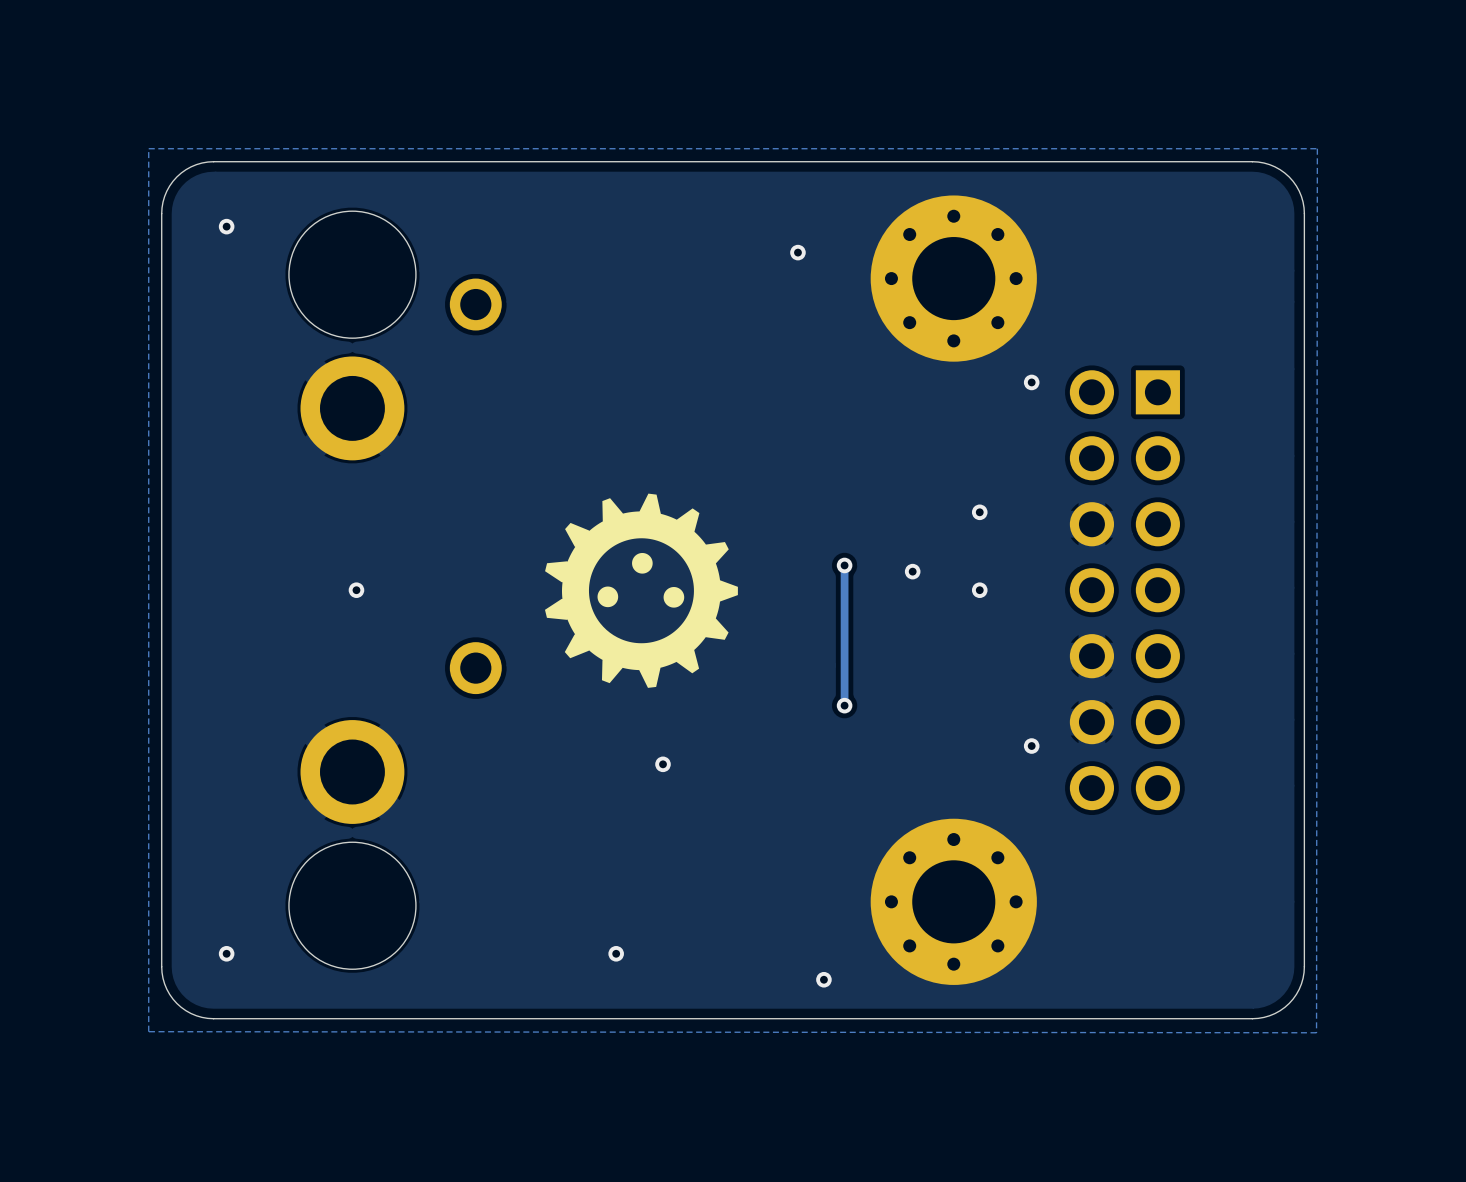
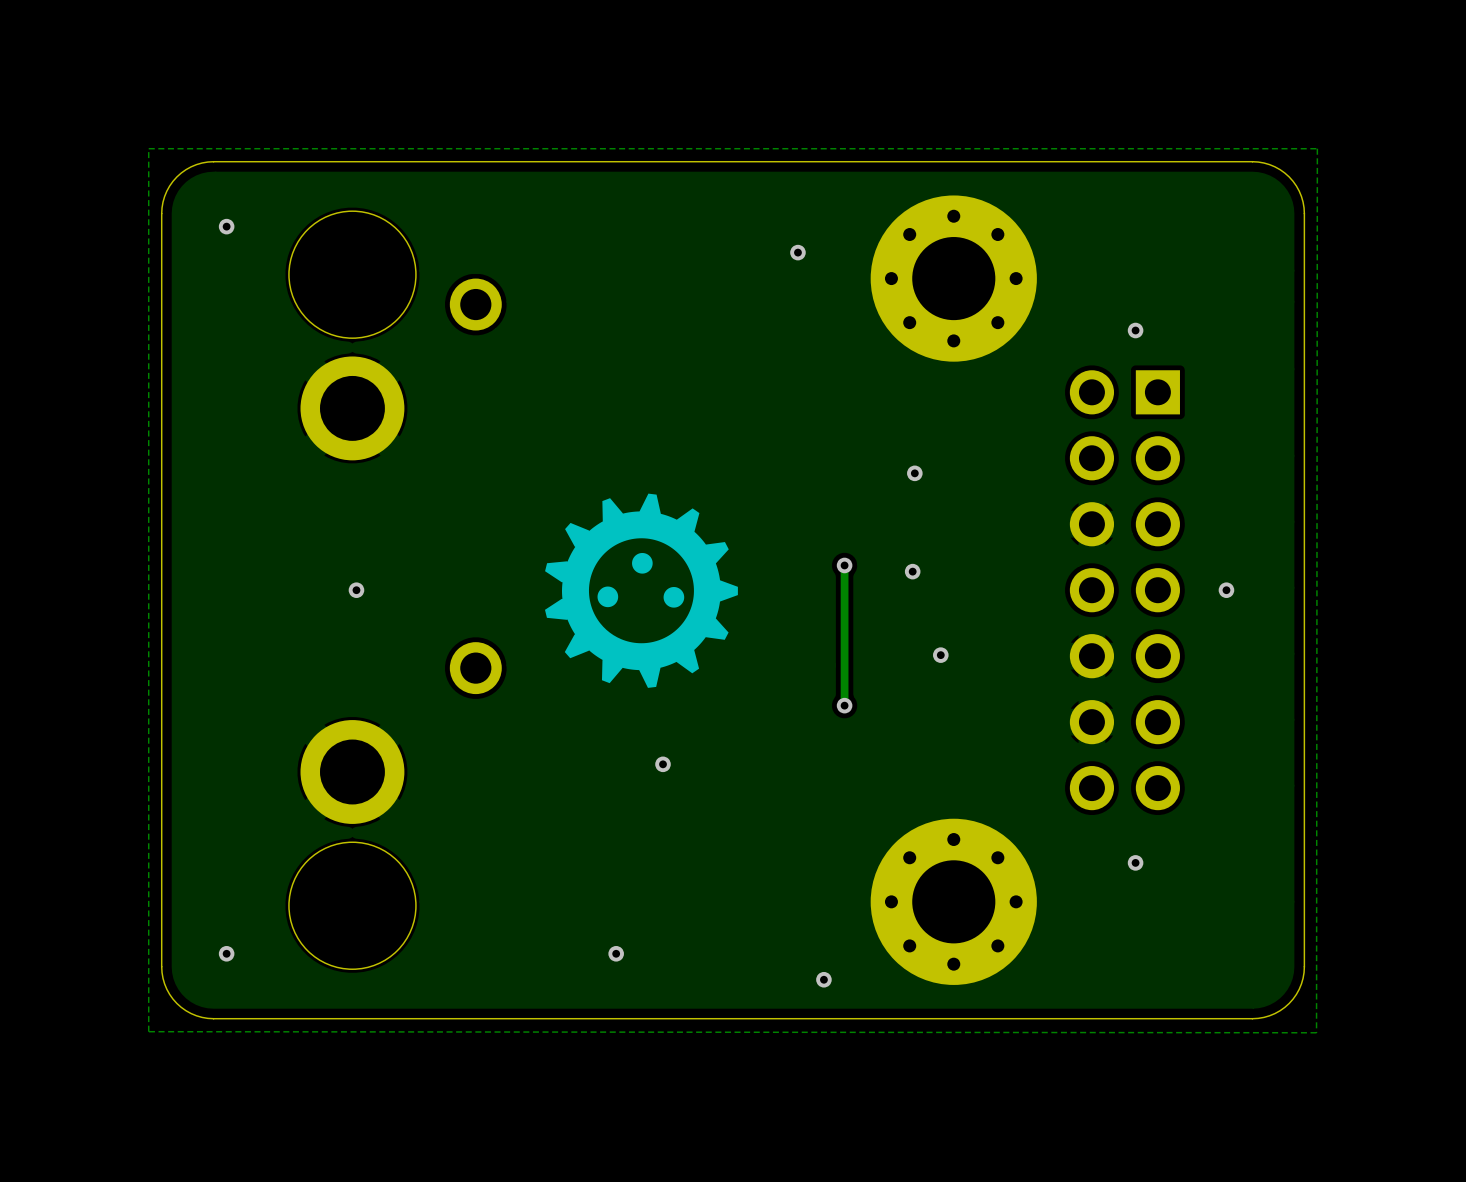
via: none -> (1135, 330)
via: (1031, 382) -> none
via: none -> (914, 473)
via: (979, 512) -> none
via: (979, 590) -> none
via: none -> (1226, 590)
via: none -> (940, 655)
via: (1031, 746) -> none
via: none -> (1135, 862)

